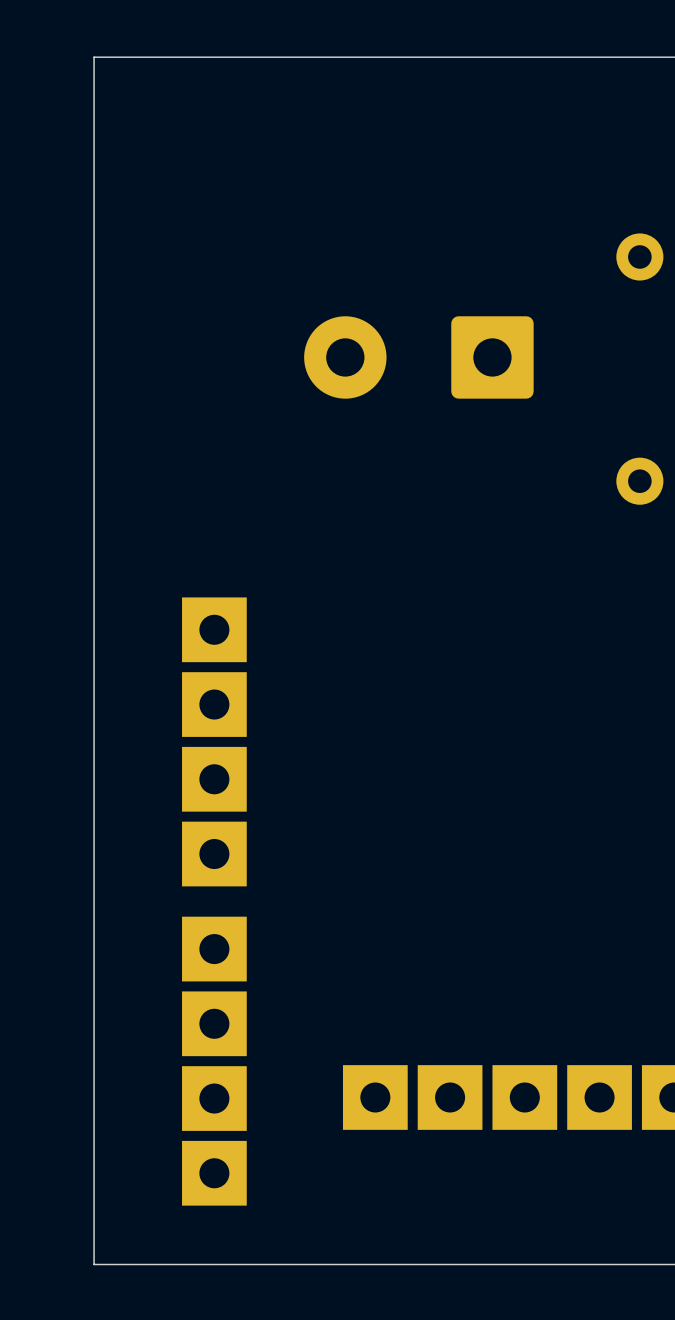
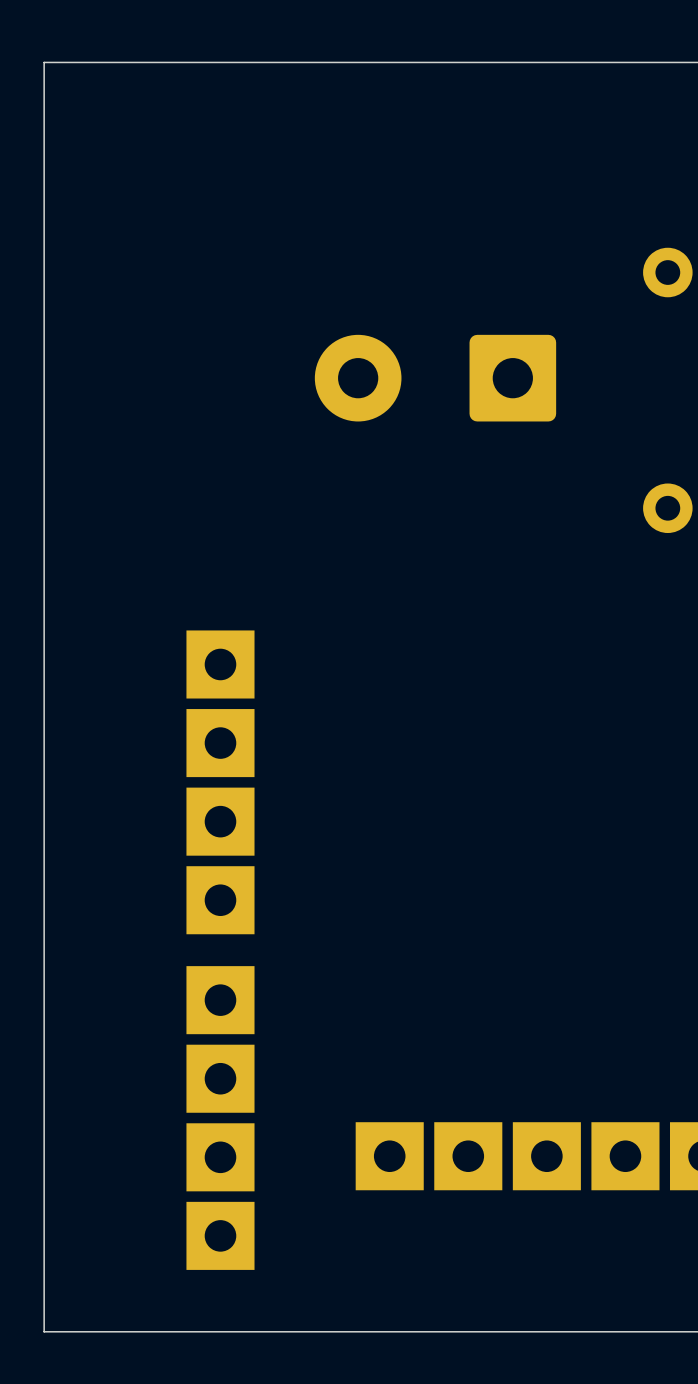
board edge: (94, 57) (94, 1264) -> (93, 62) (44, 62) (44, 1331) (93, 1331)

